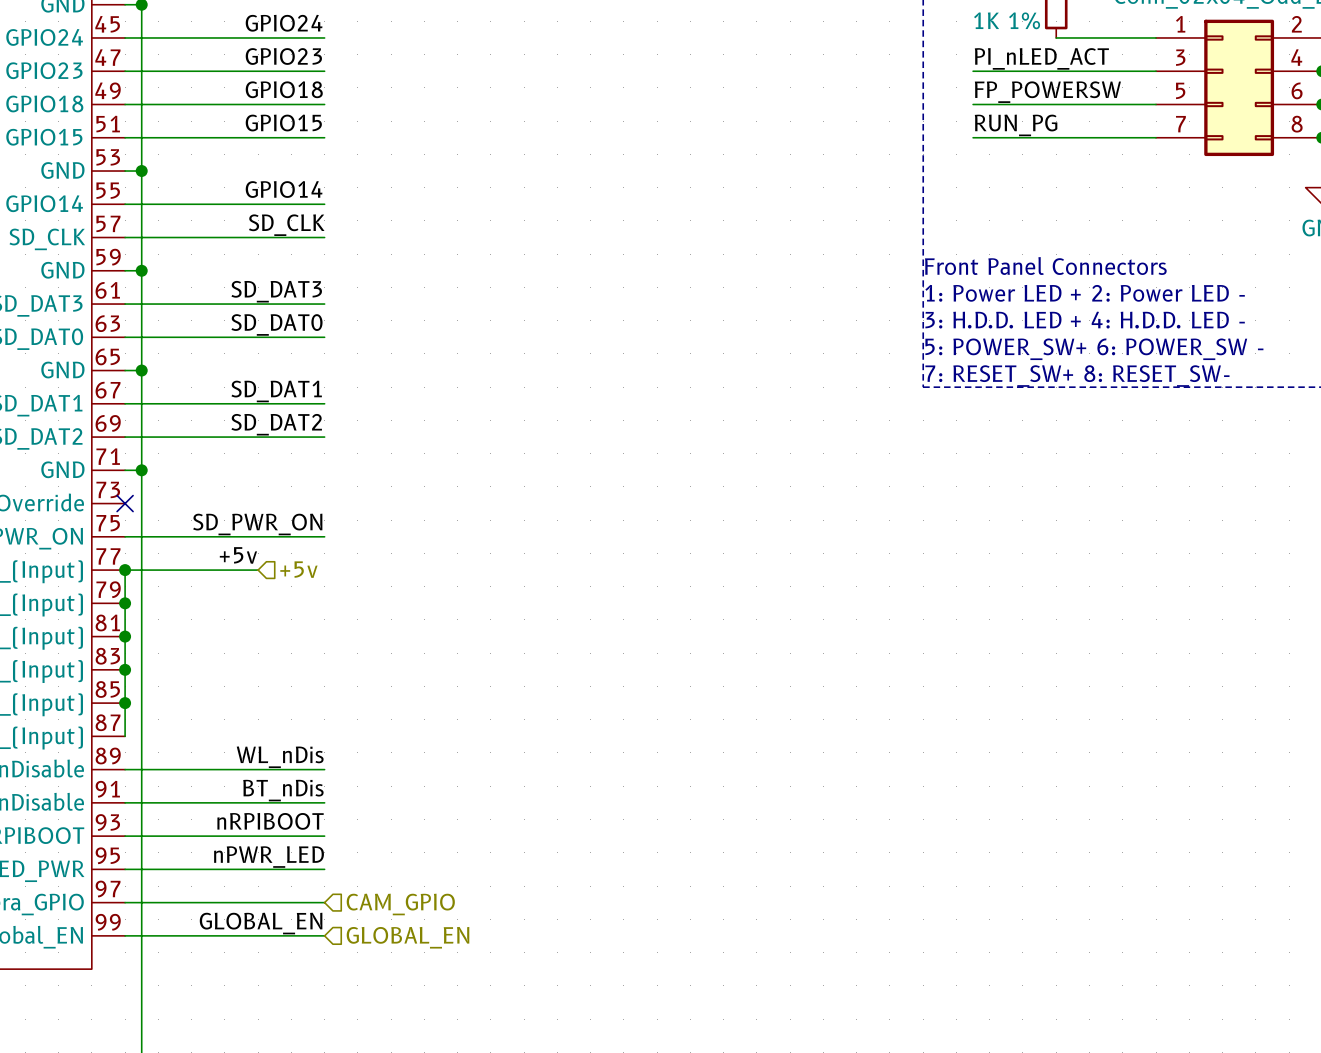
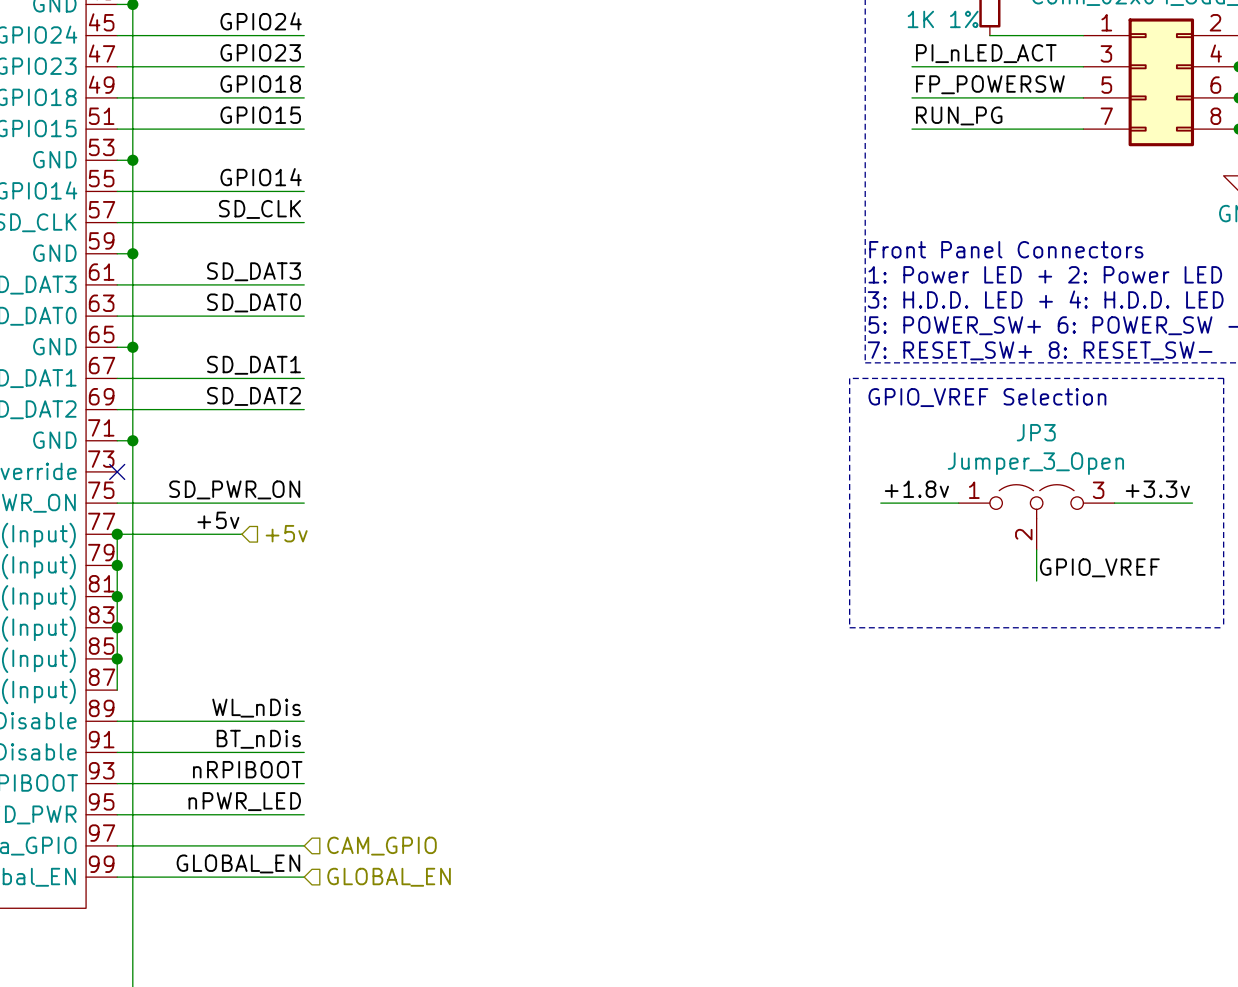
line: none -> (849, 378) (1223, 378) (1223, 627) (849, 627) (849, 378)
text: none -> GPIO_VREF Selection (987, 397)
label: none -> +1.8v (916, 489)
label: none -> +3.3v (1157, 489)
wire: none -> (880, 503) (958, 503)
wire: none -> (1114, 503) (1192, 503)
JP3: none -> Jumper_3_Open (1036, 517)
wire: none -> (1036, 549) (1036, 581)
label: none -> GPIO_VREF (1099, 567)

